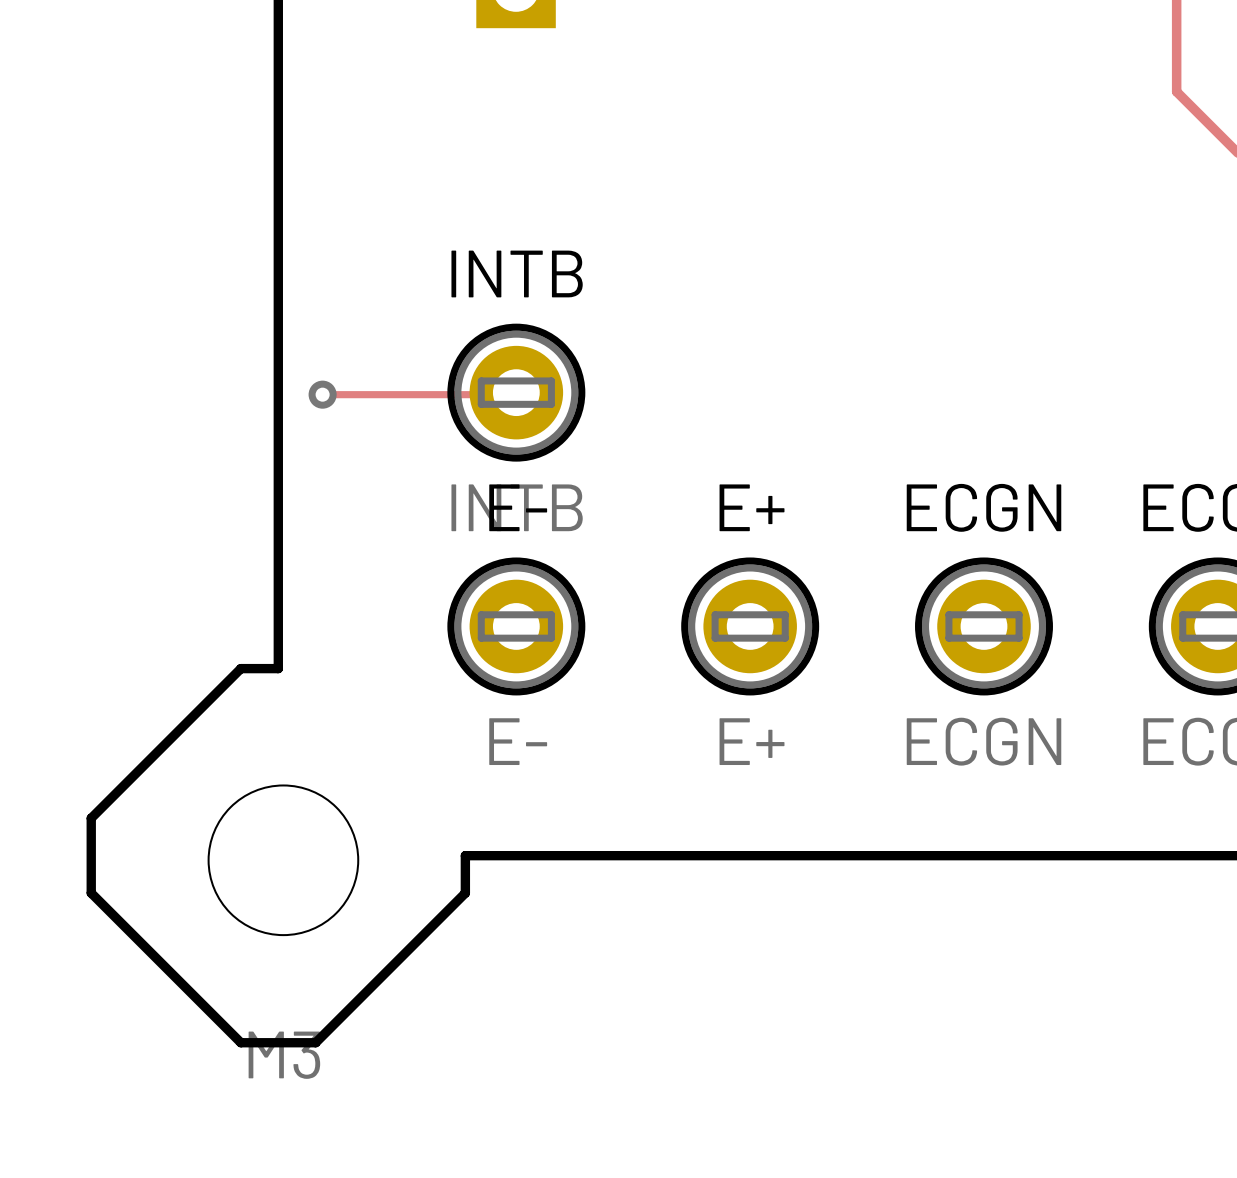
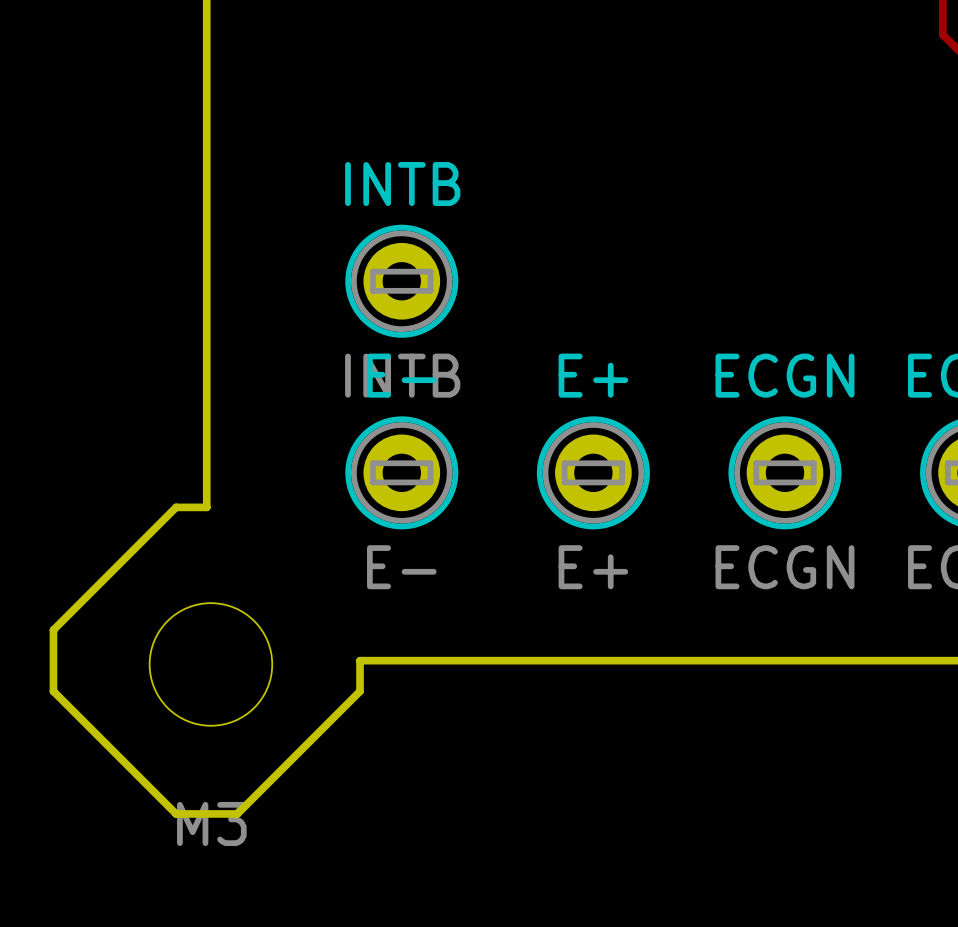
track: (516, 392) (514, 394) (322, 394) -> none
via: (322, 394) -> none

